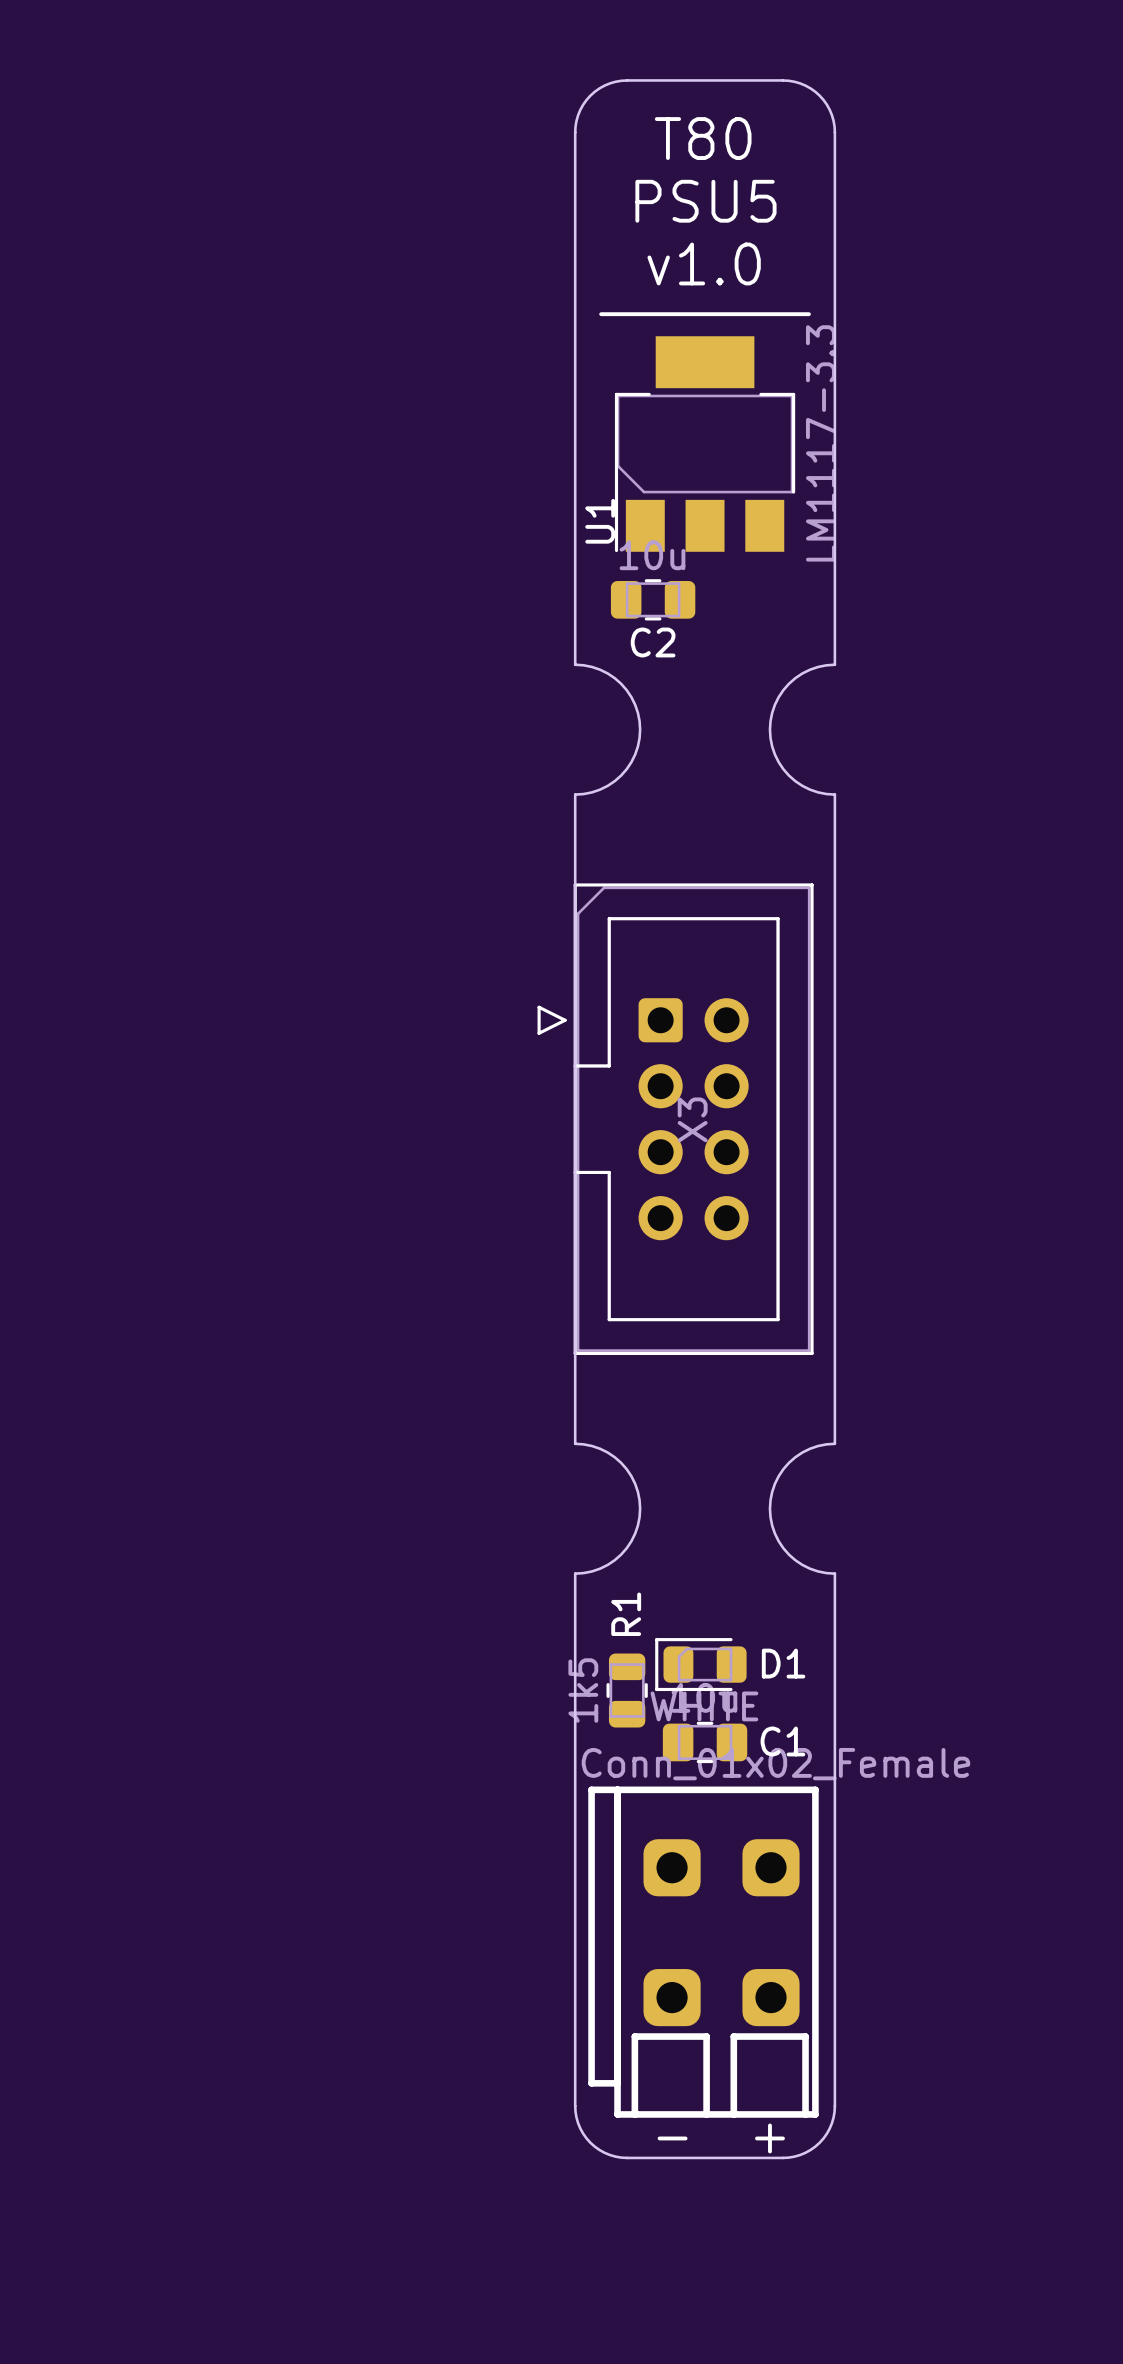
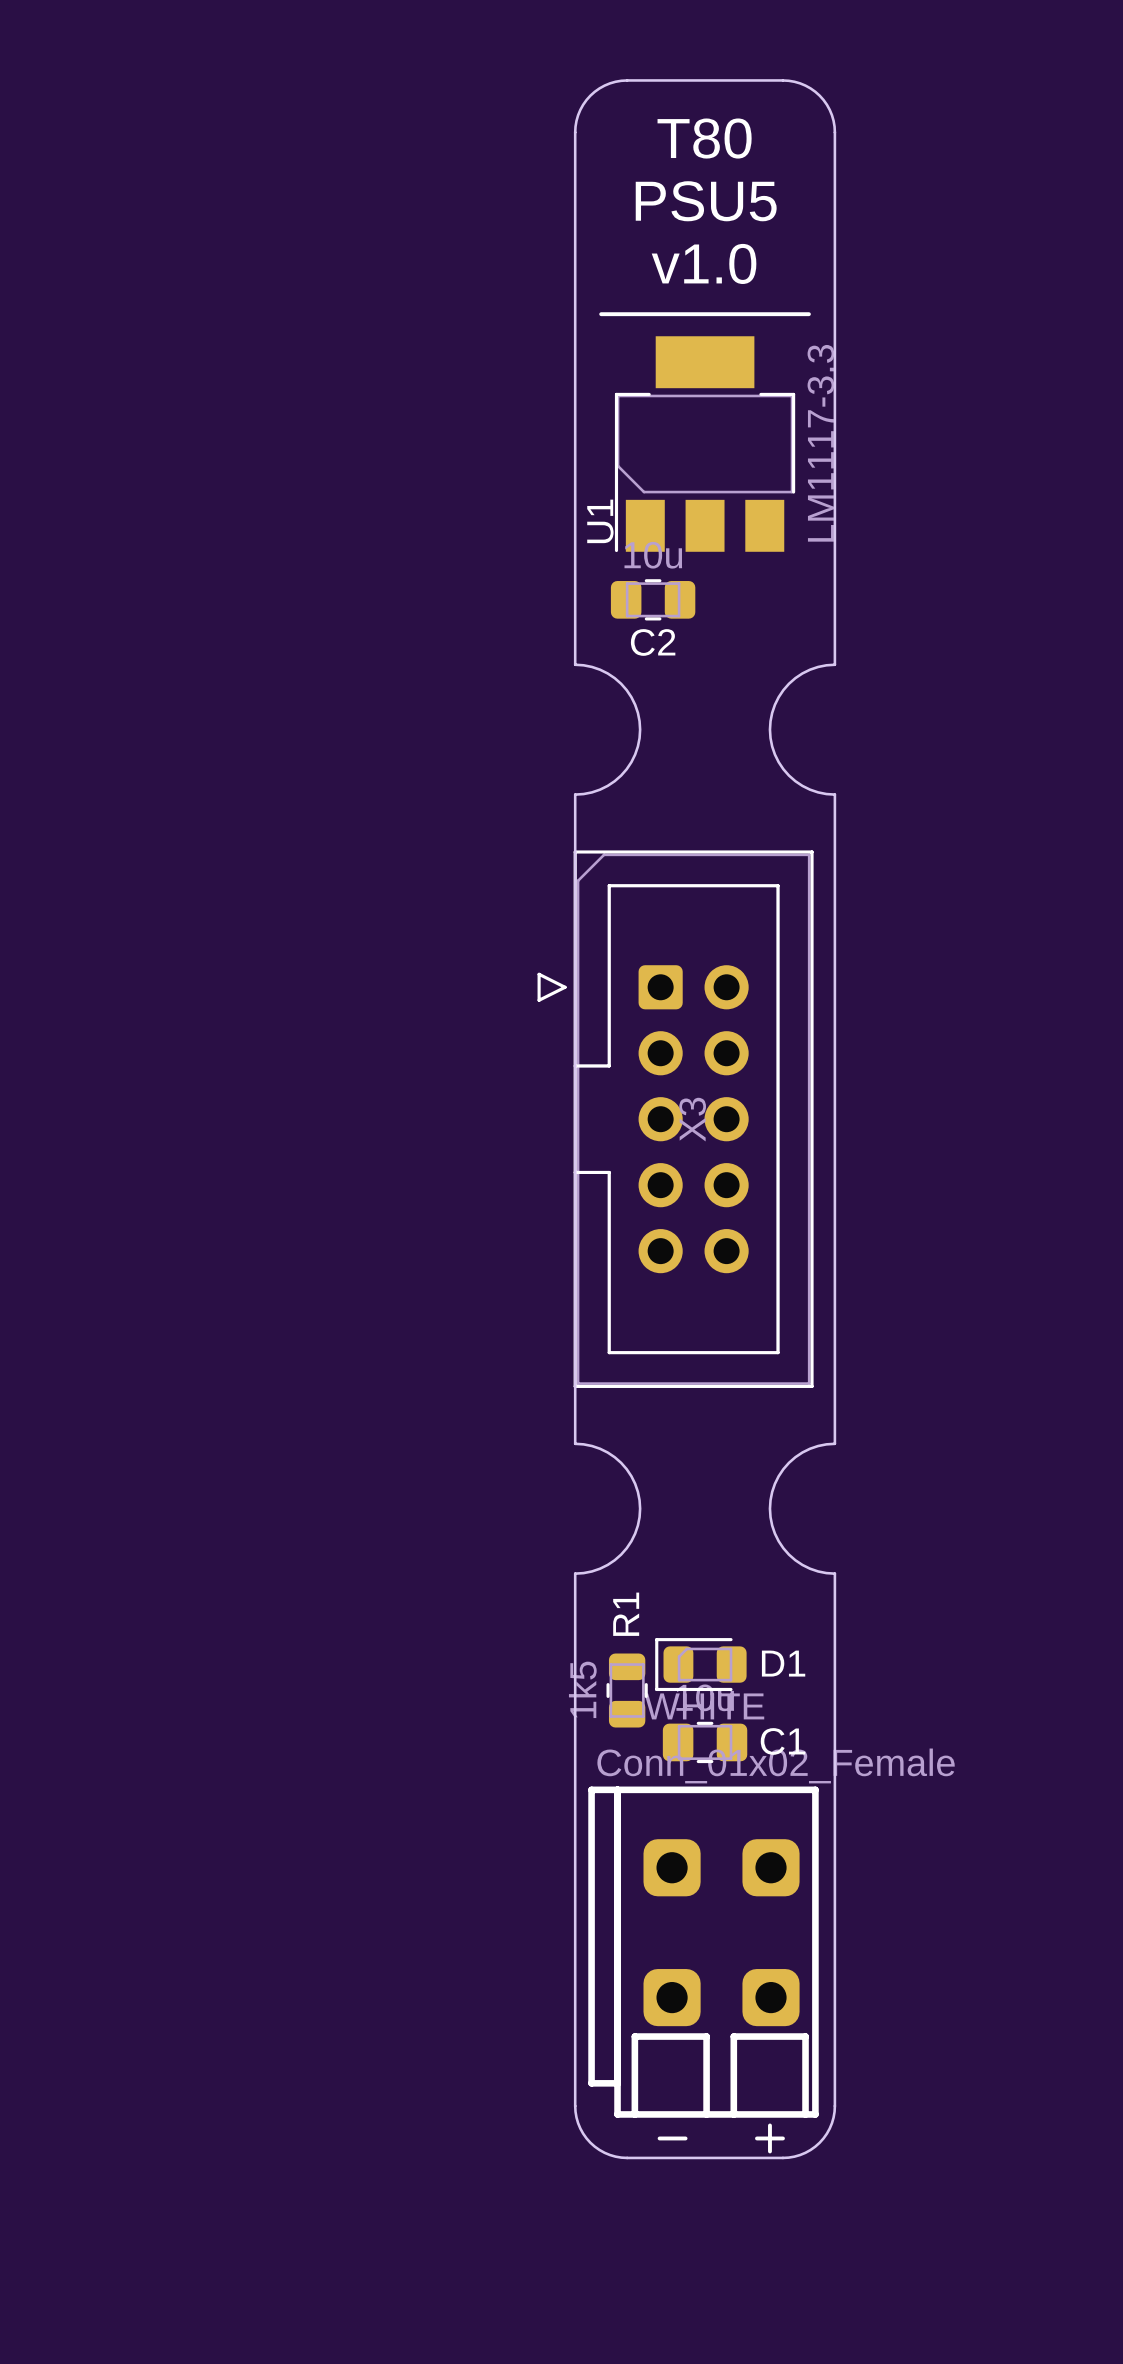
X3 footprint: [537, 883, 814, 1356] -> [537, 850, 814, 1388]

